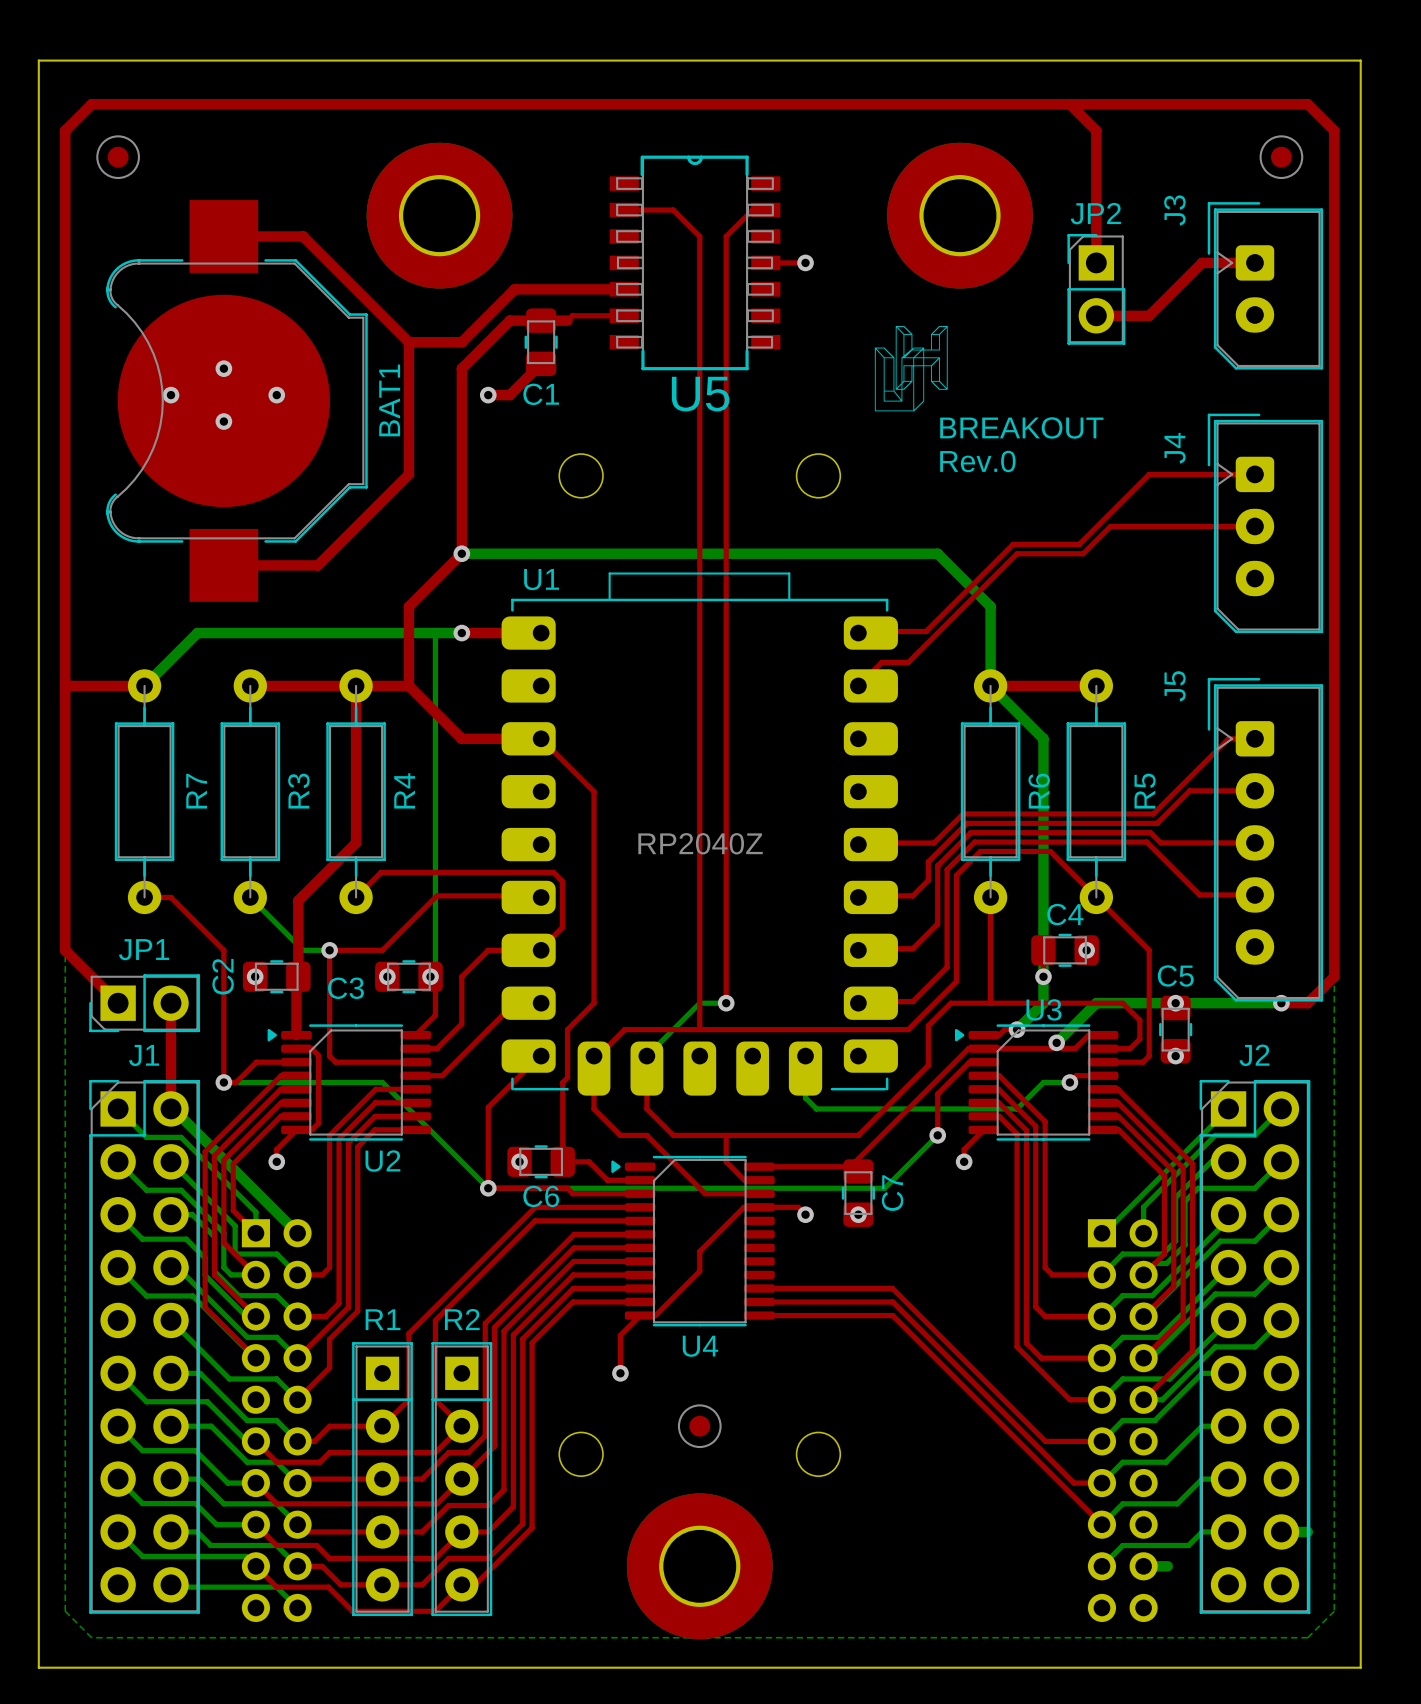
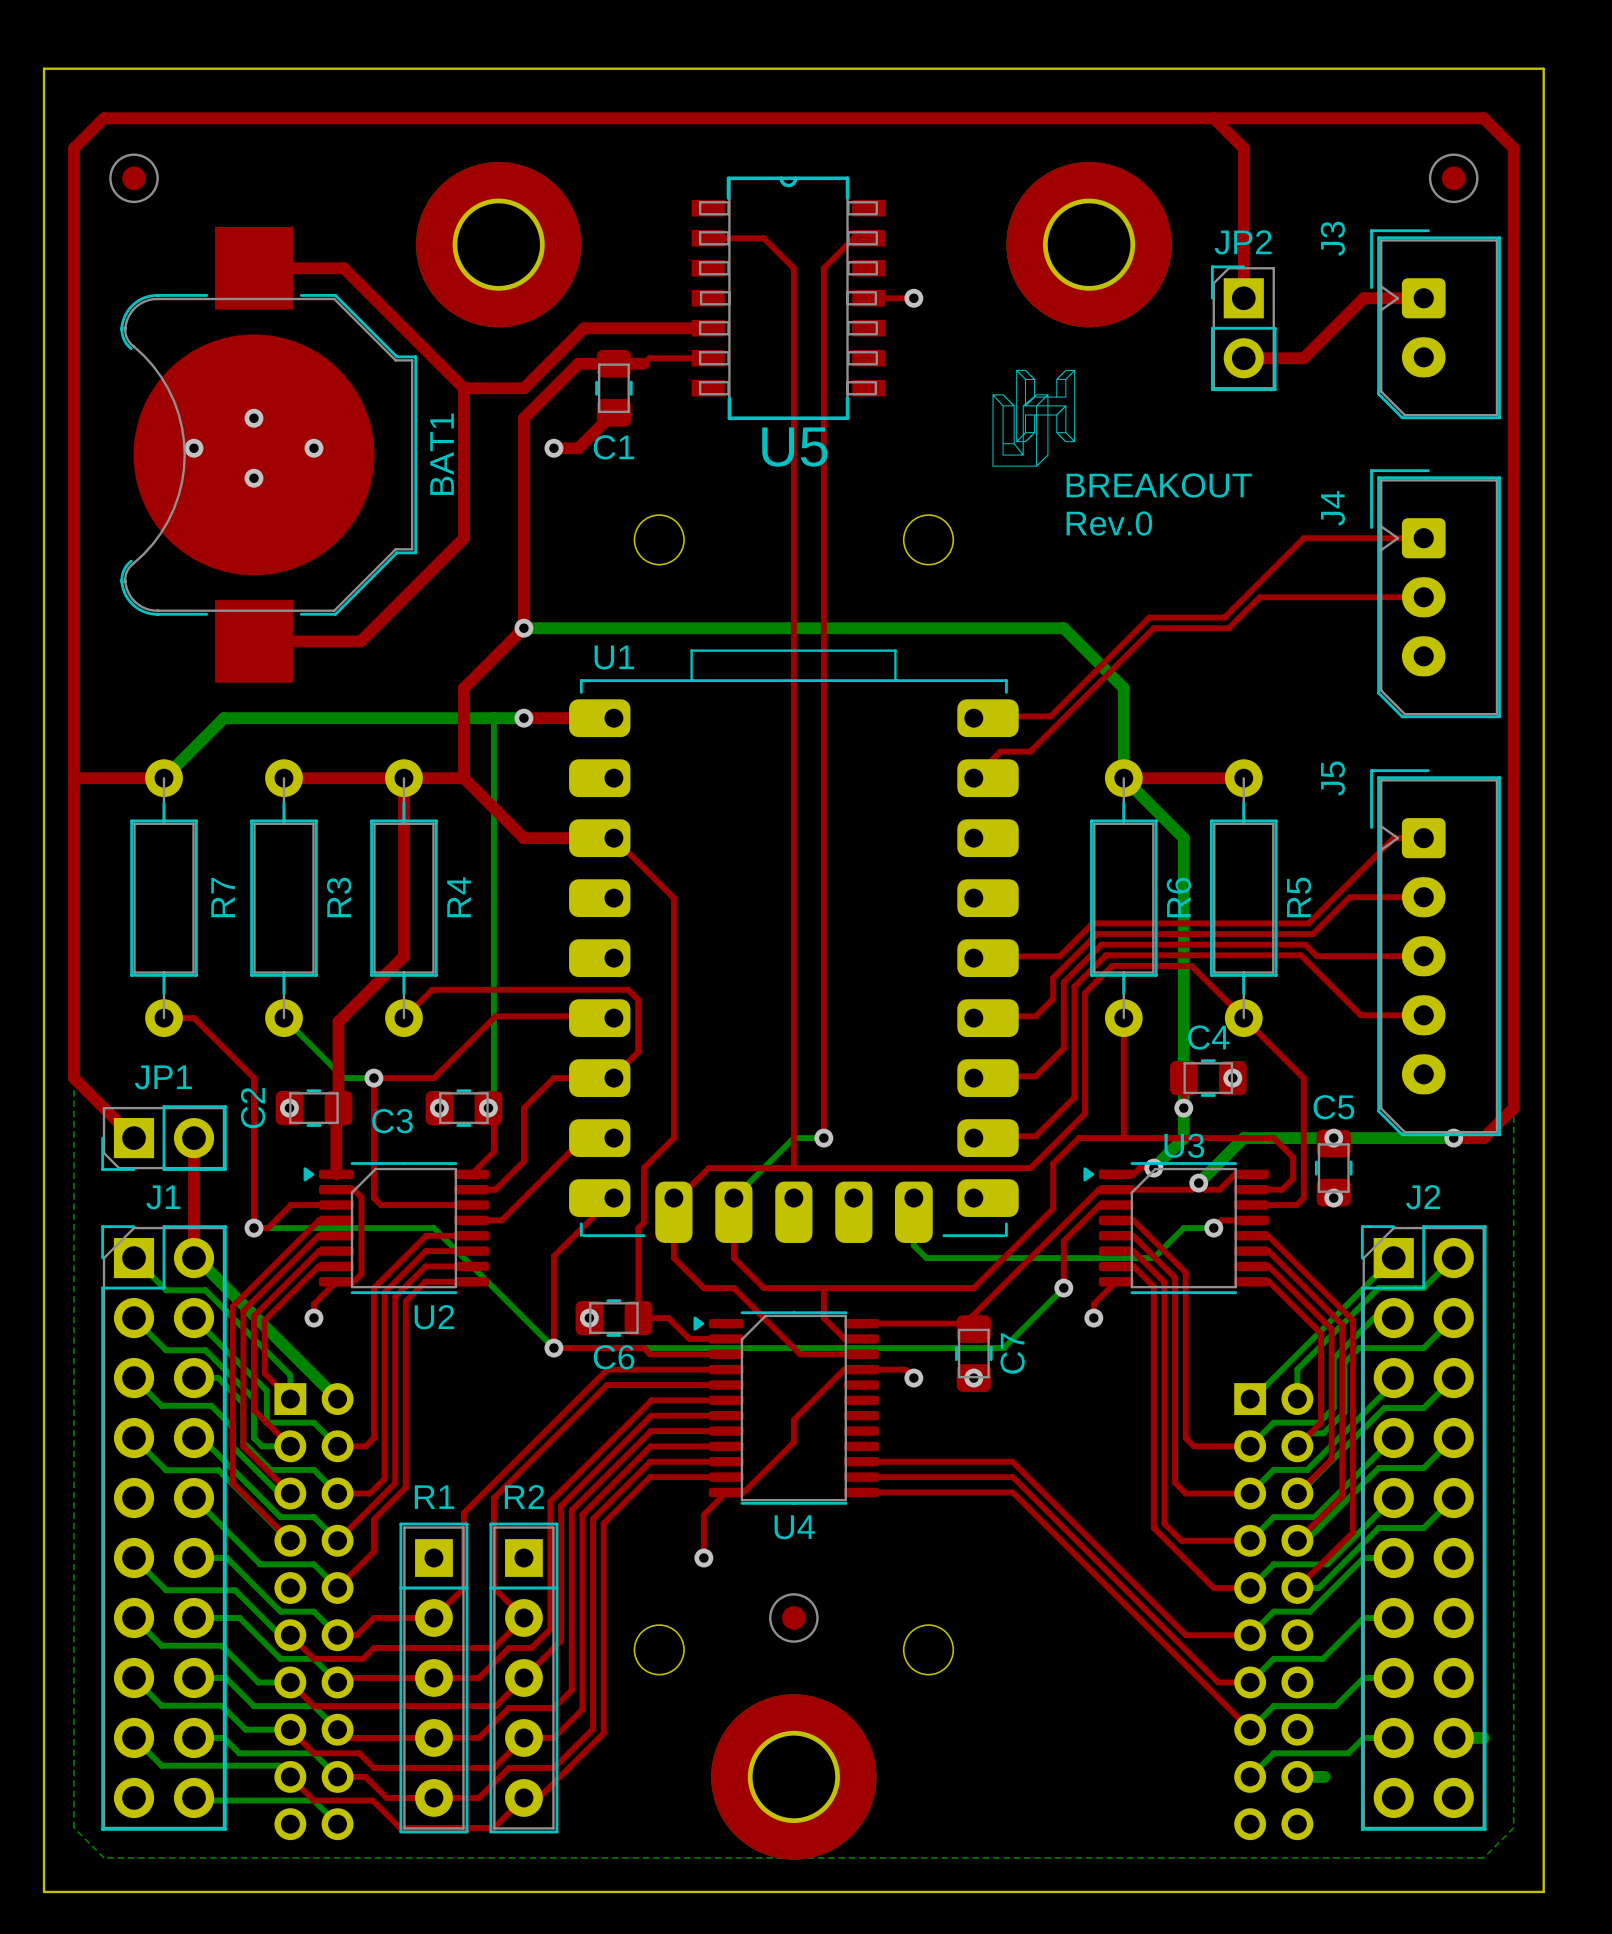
U1 value: RP2040Z (700, 843) -> none

